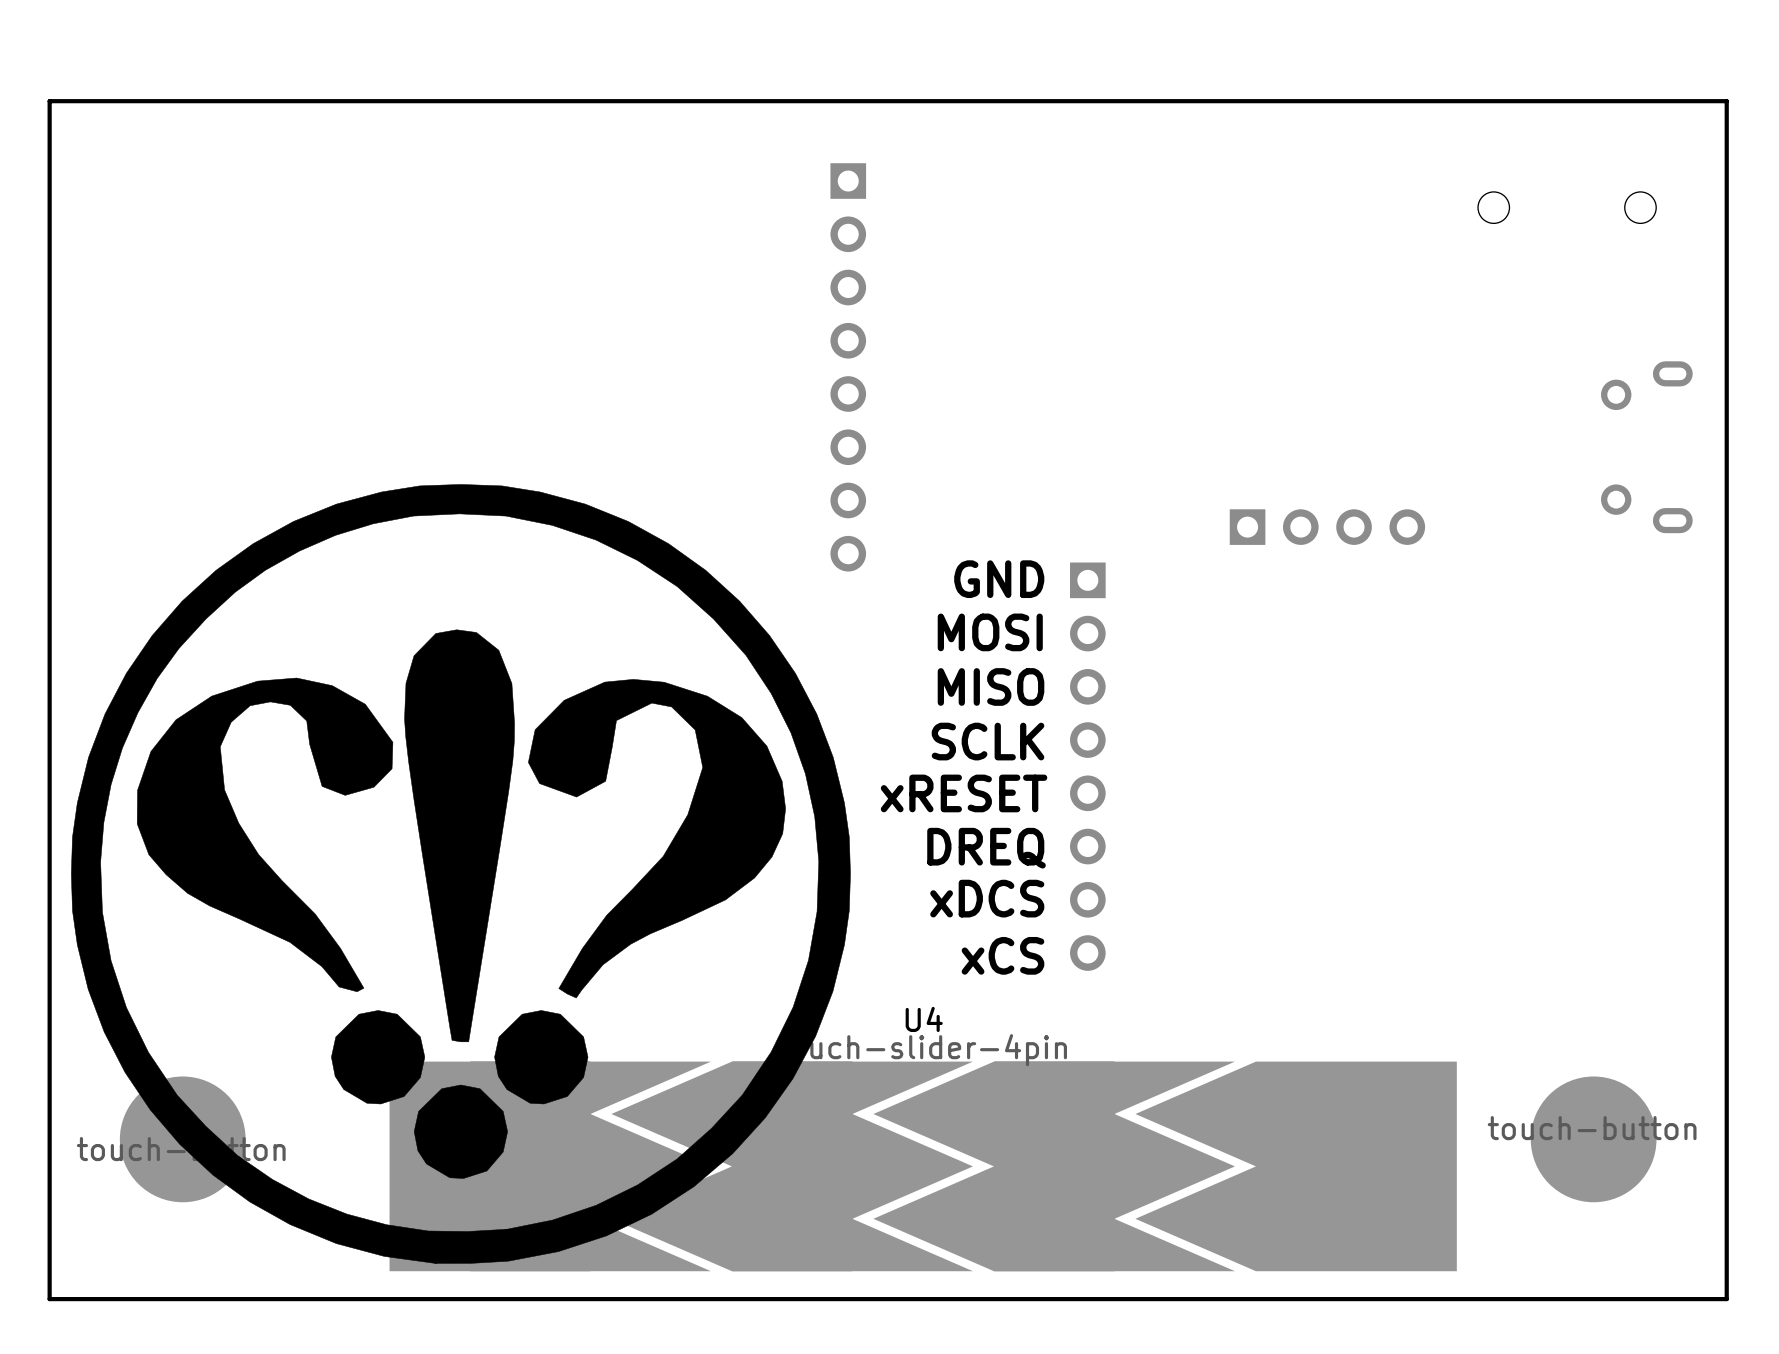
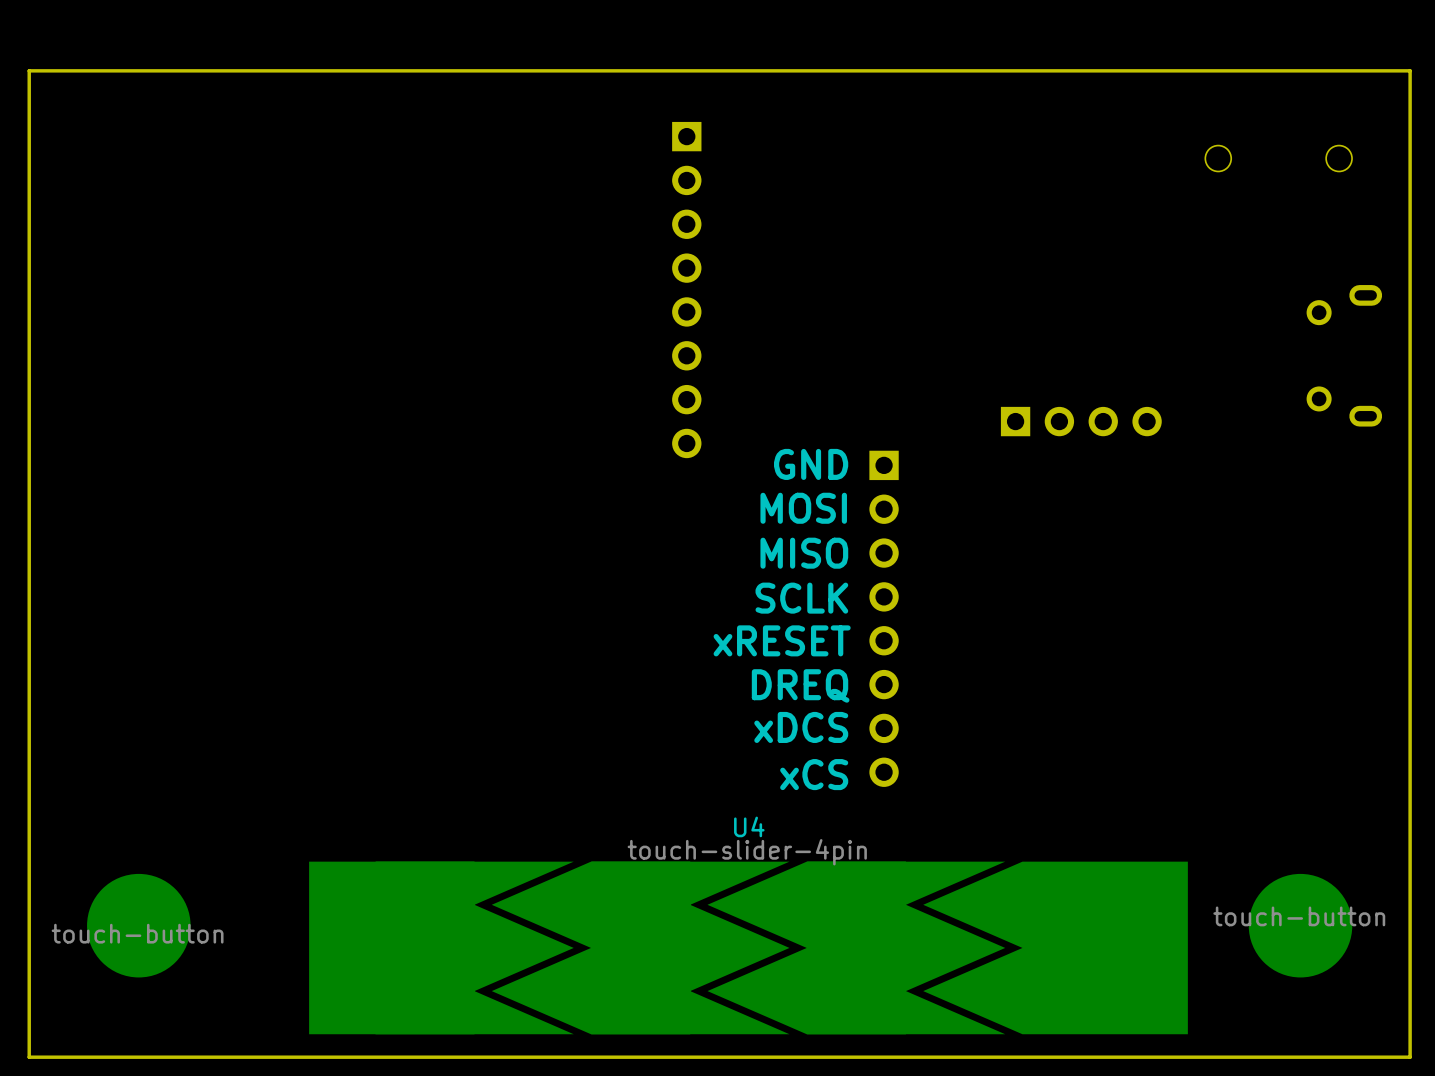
drawing: [71, 484, 851, 1264] -> none

